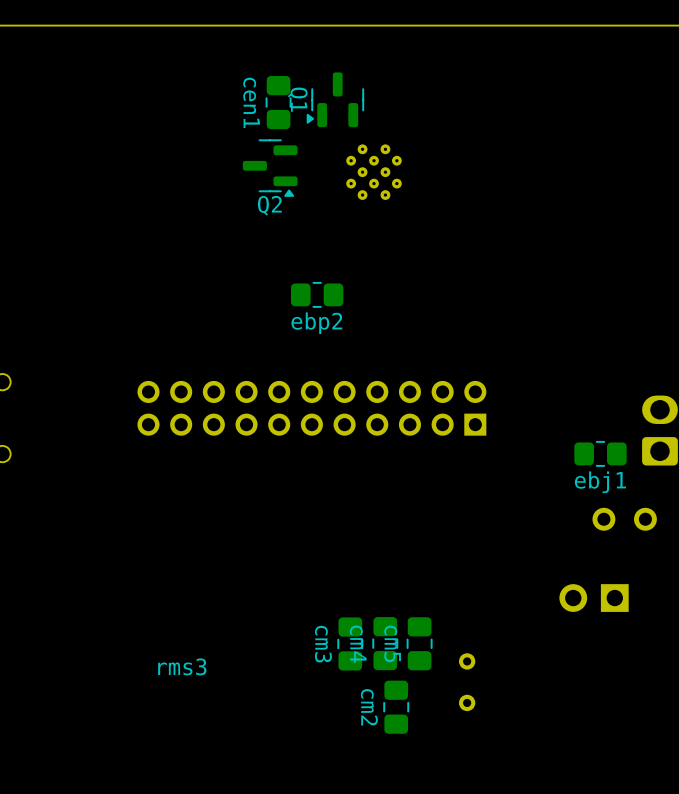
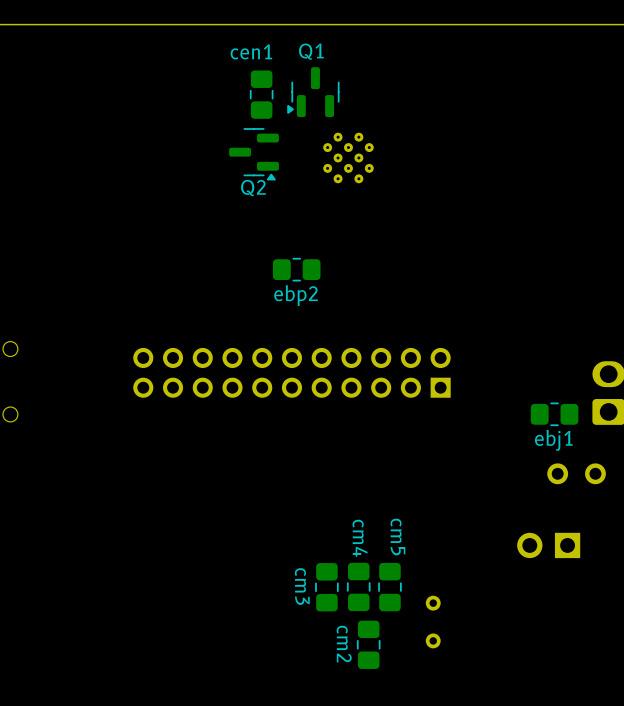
Q1 name rotation: 0° (297, 99) -> 90° counterclockwise (311, 51)
Q1 name position: Q1 (297, 99) -> Q1 (311, 51)
cen1 name rotation: 0° (251, 102) -> 90° counterclockwise (251, 51)
cm5 name position: cm5 (392, 643) -> cm5 (397, 536)
cm4 name position: cm4 (358, 644) -> cm4 (360, 538)
rms3: (182, 666) -> none

